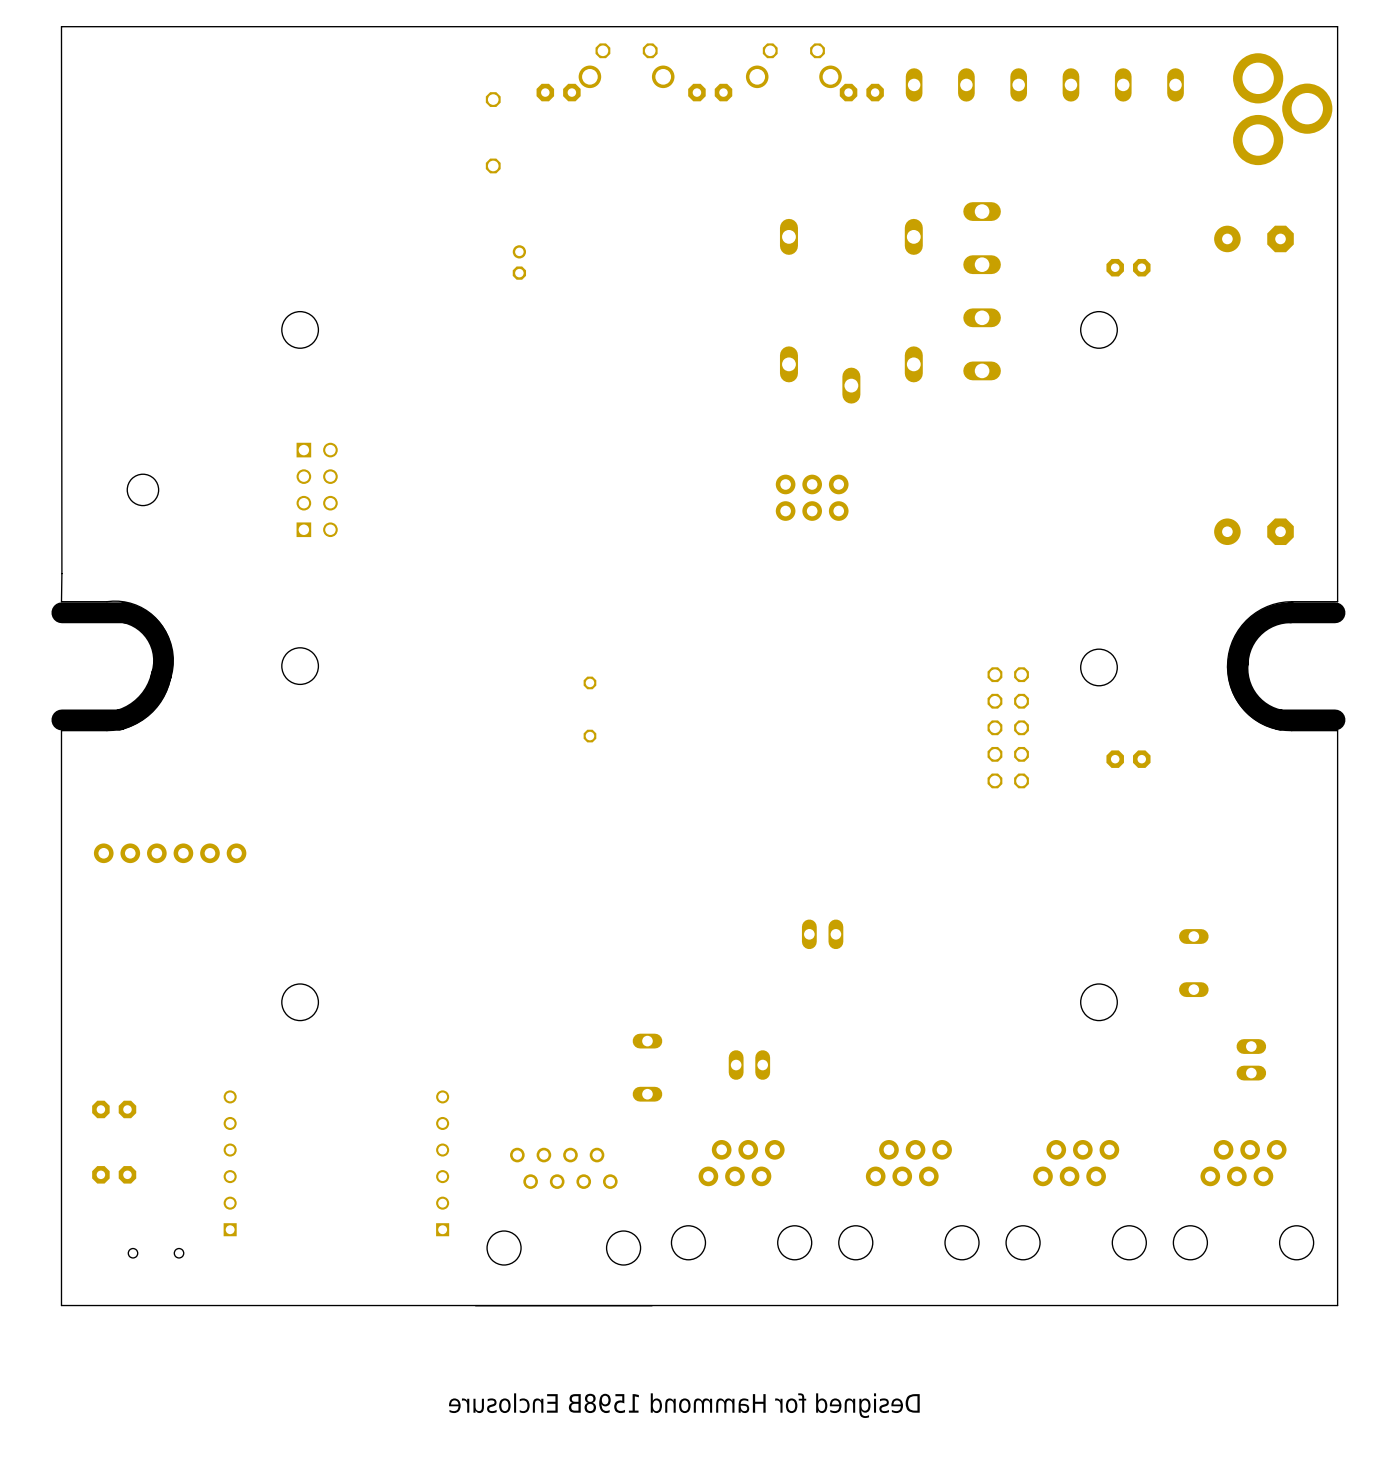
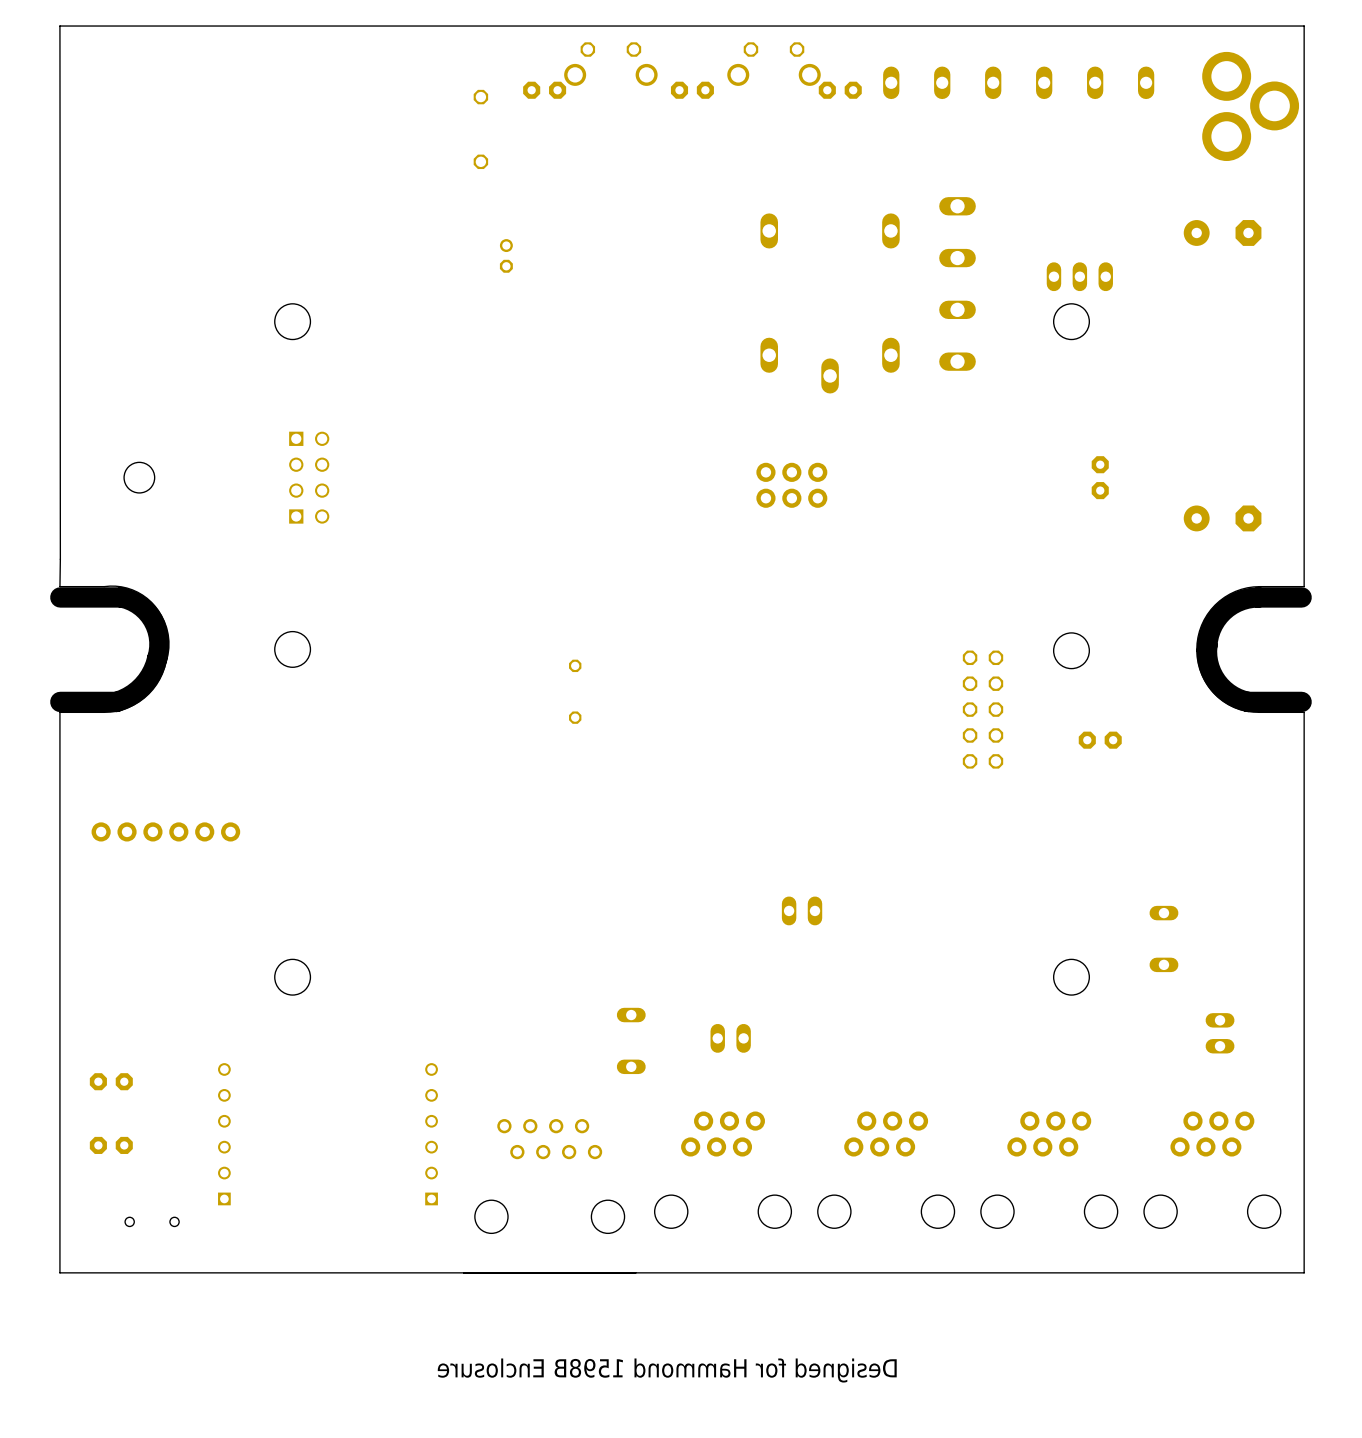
part rotation: 0° (1128, 267) -> 90° clockwise (1100, 477)
part position: (1128, 267) -> (1100, 477)
part: none -> (1079, 276)

